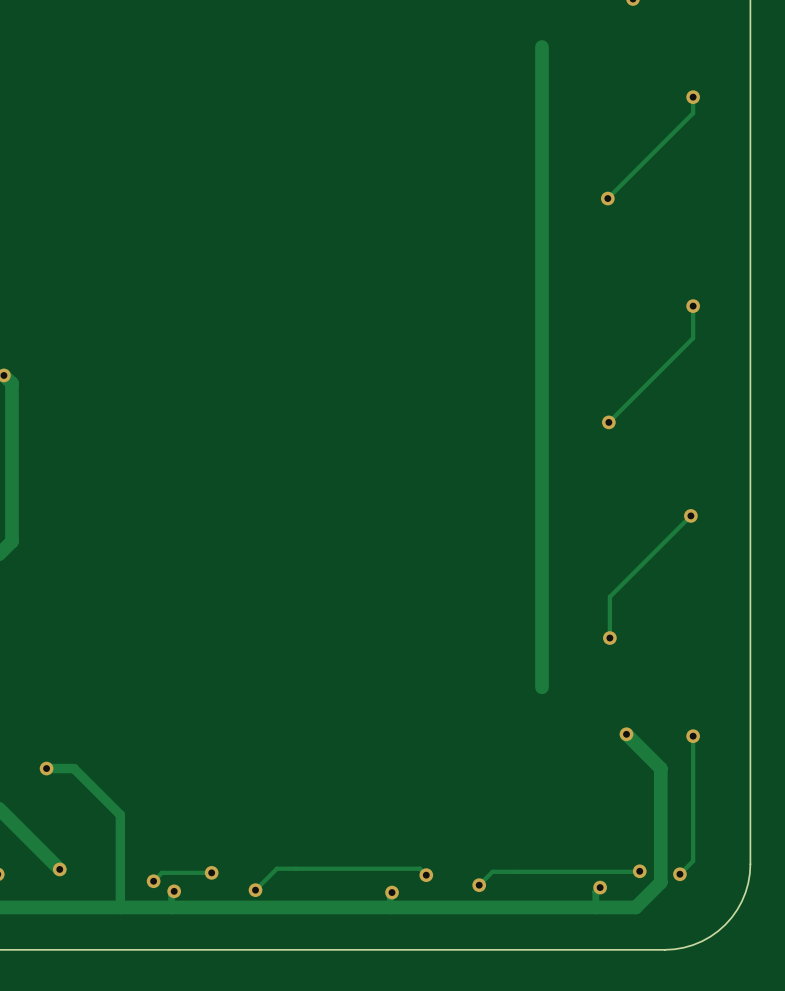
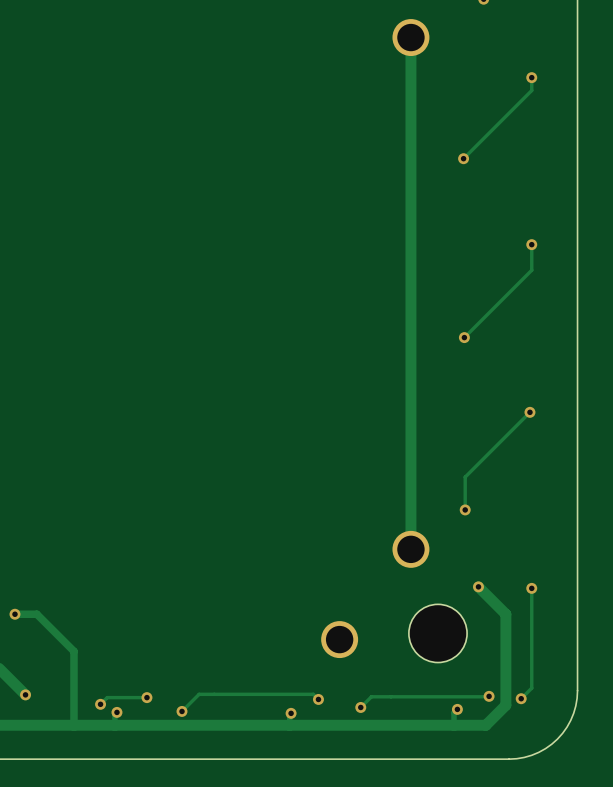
part: none -> (410, 37)
part: none -> (410, 549)
part: none -> (437, 633)
part: none -> (339, 639)

